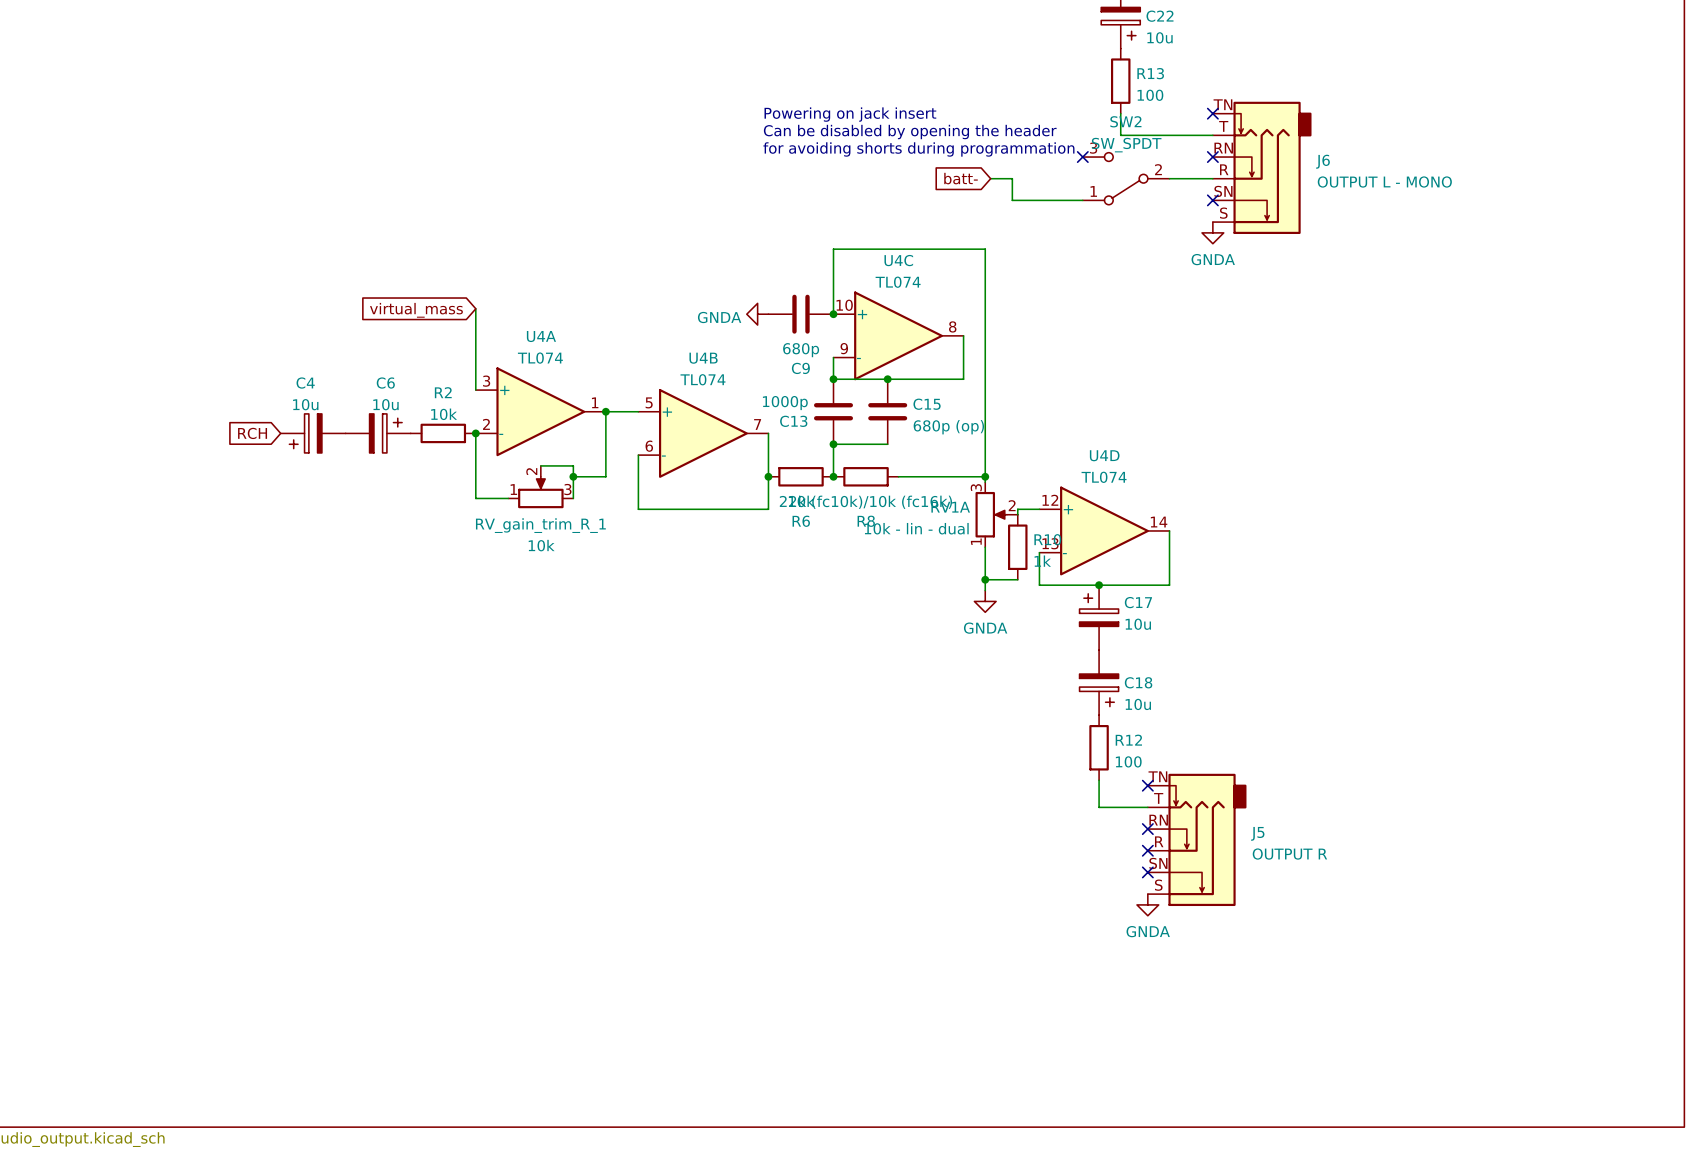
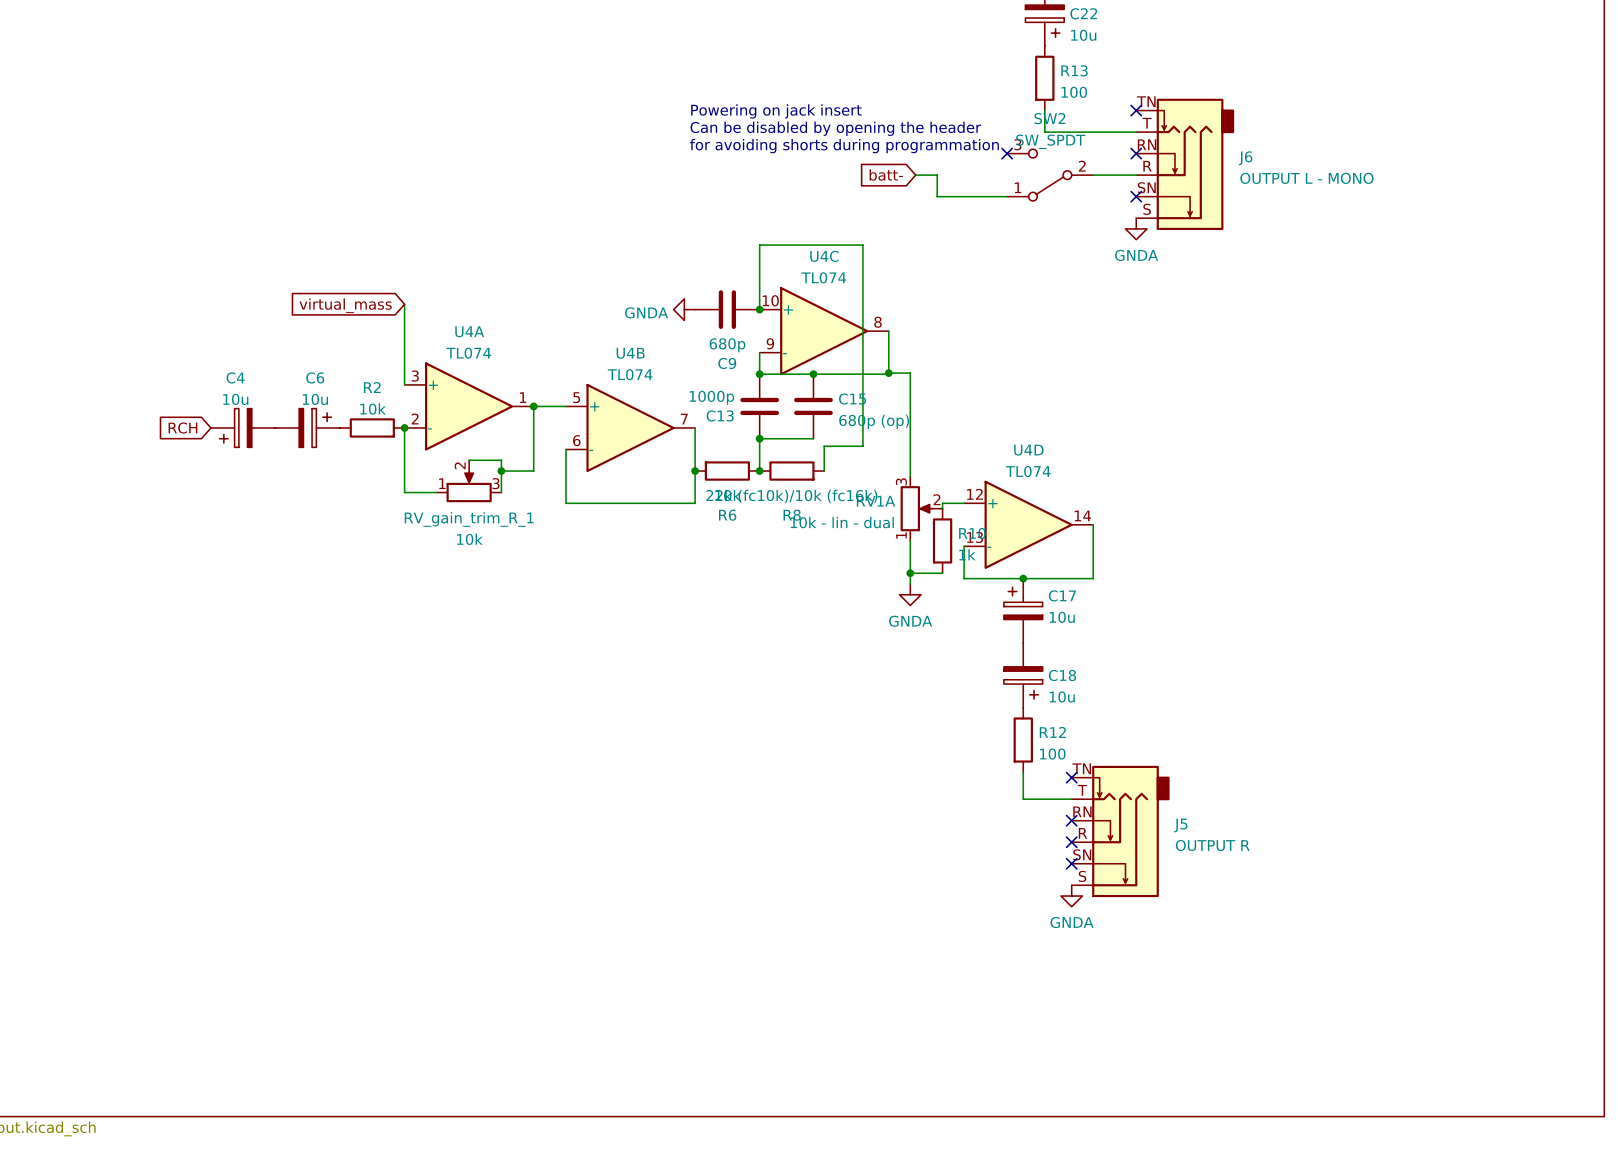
wire: (937, 249) (985, 249) (985, 378) -> (862, 245) (862, 446) (824, 446) (824, 471)
wire: none -> (888, 373) (910, 373)
junction: none -> (888, 373)
wire: (898, 476) (985, 476) -> none
junction: (985, 476) -> none

